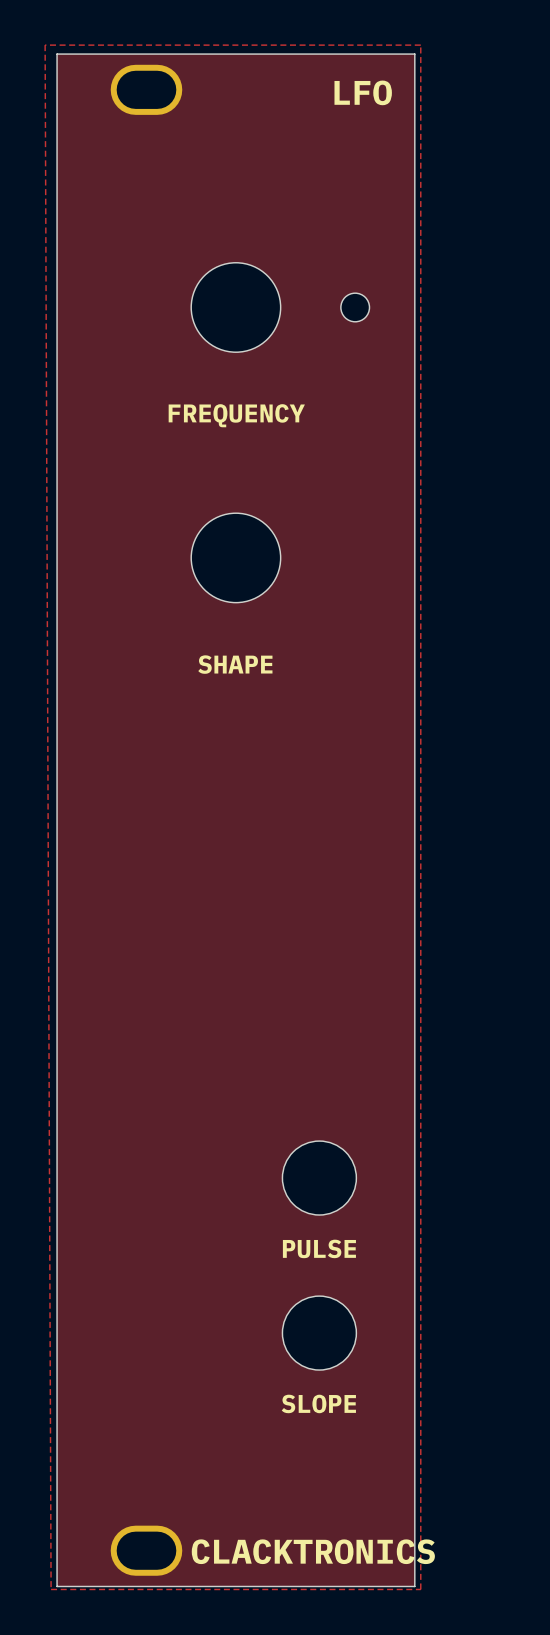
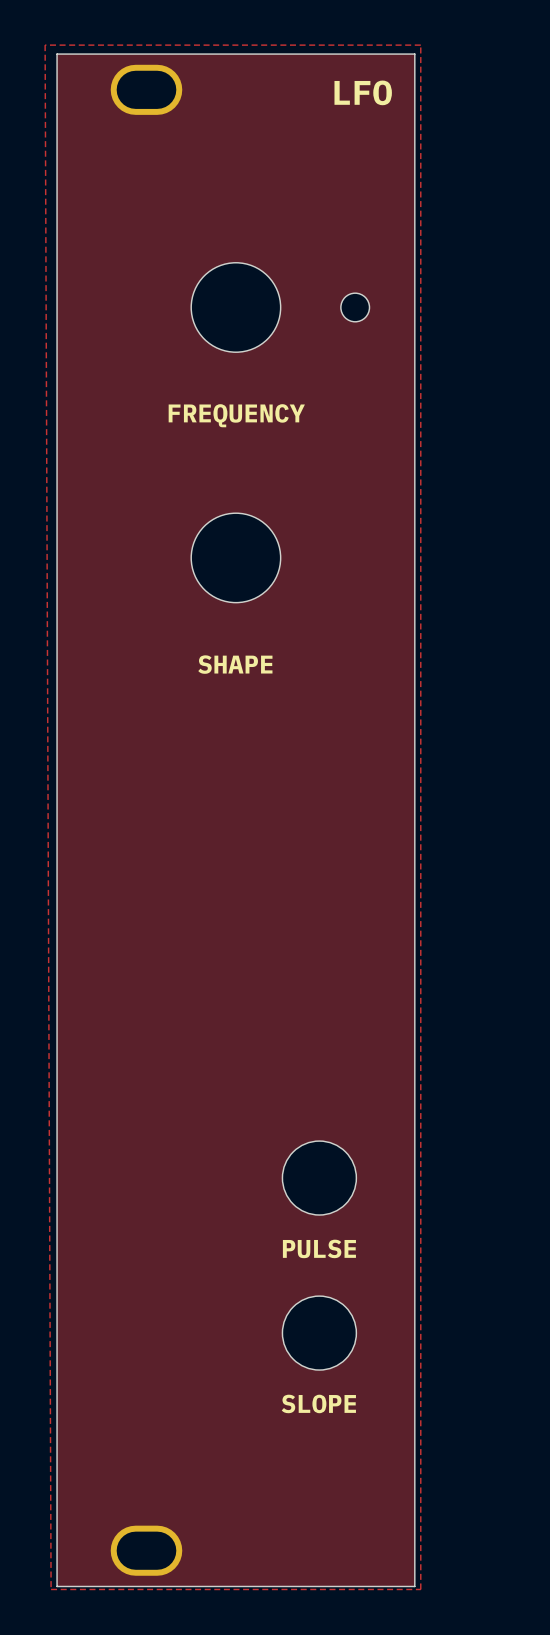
text: CLACKTRONICS (313, 1551) -> none

